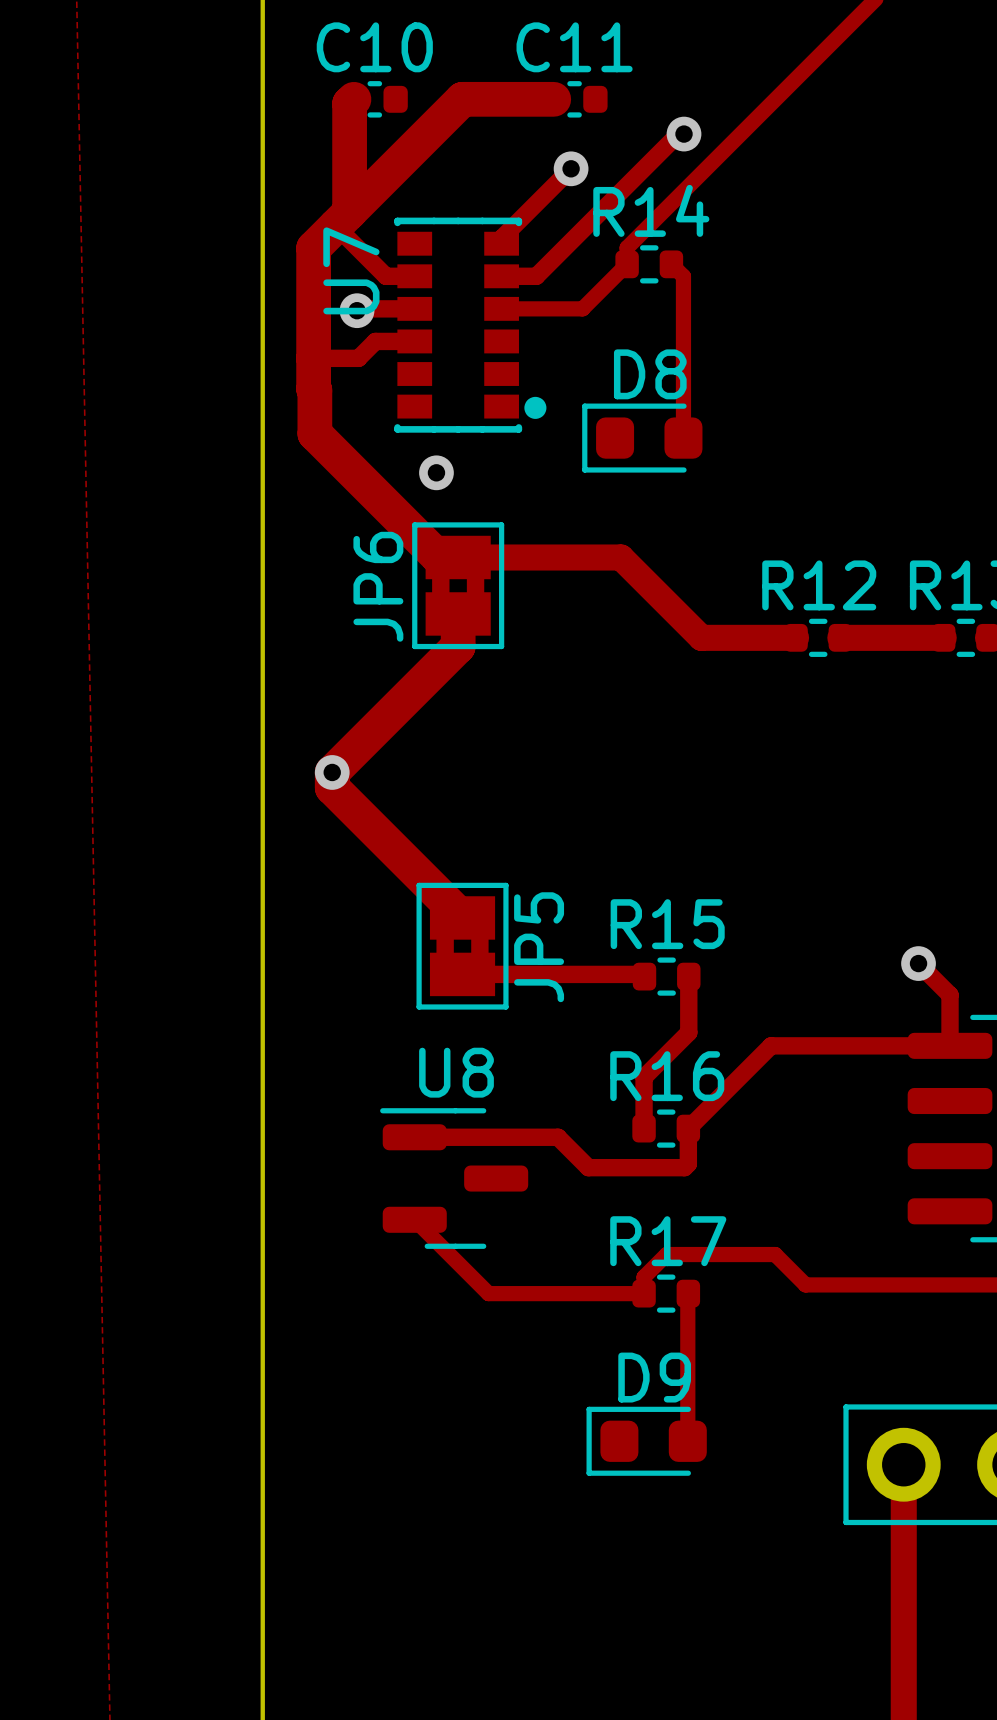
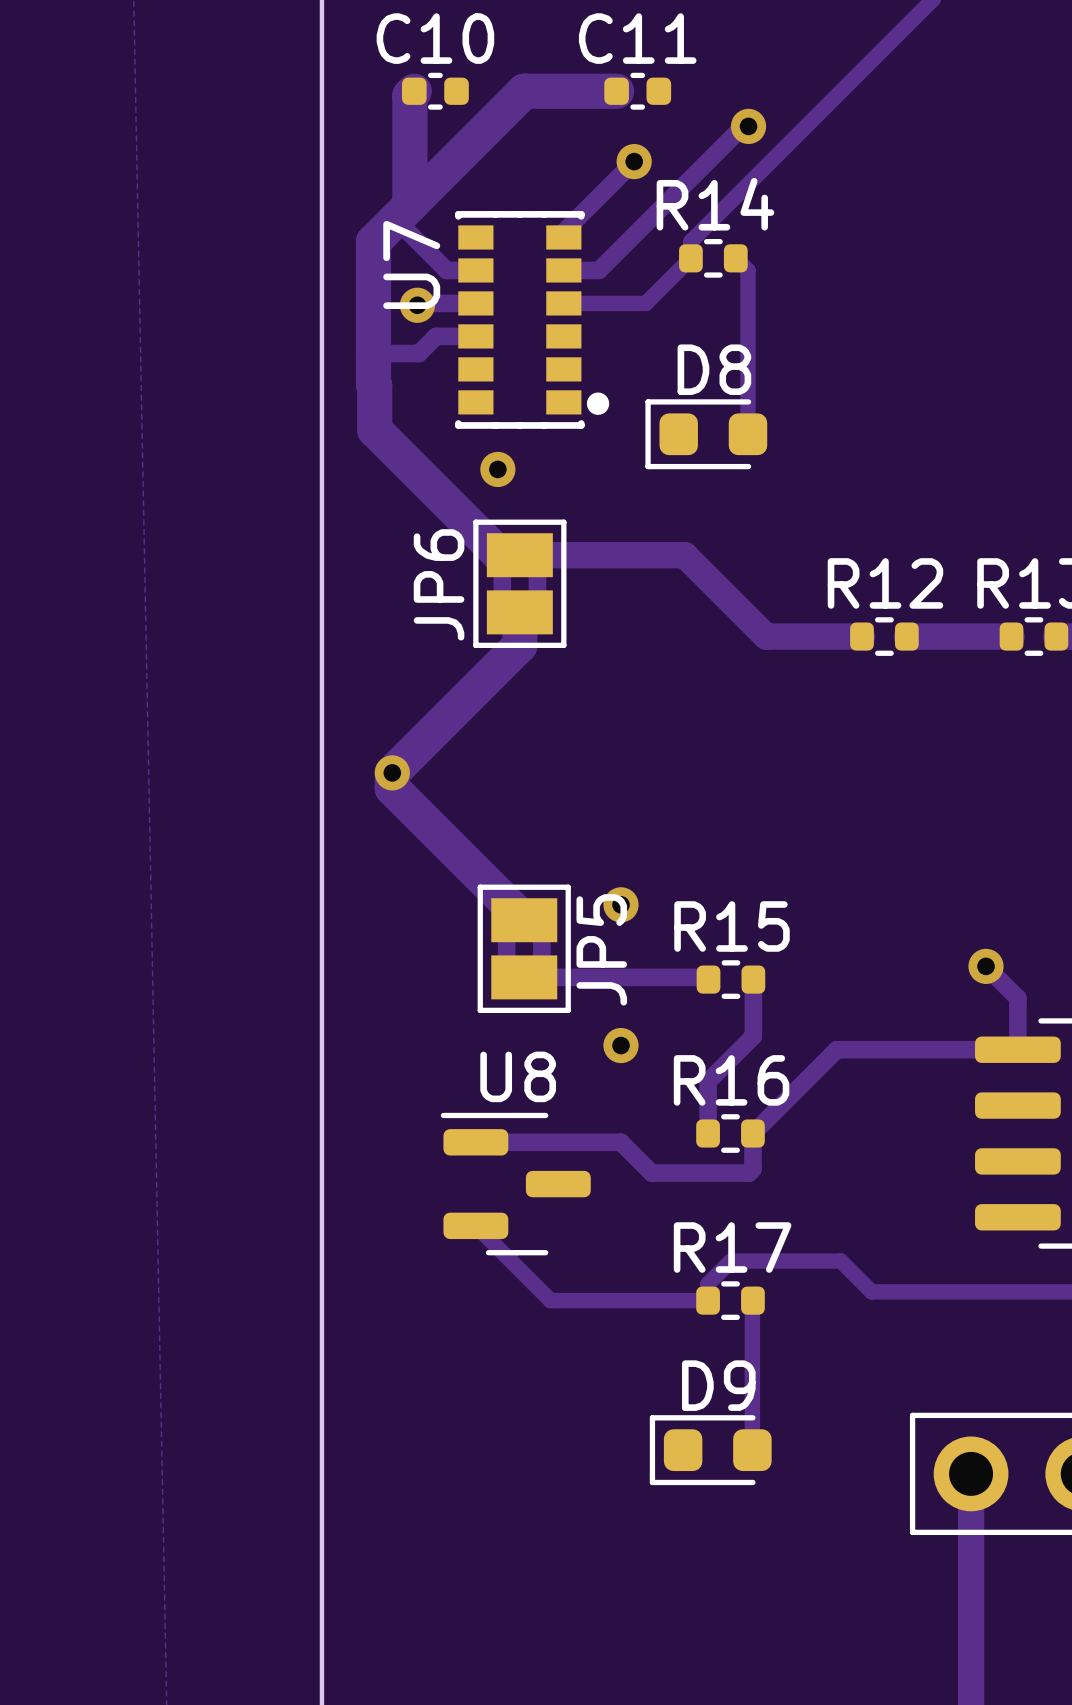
via: none -> (621, 904)
via: none -> (621, 1045)

